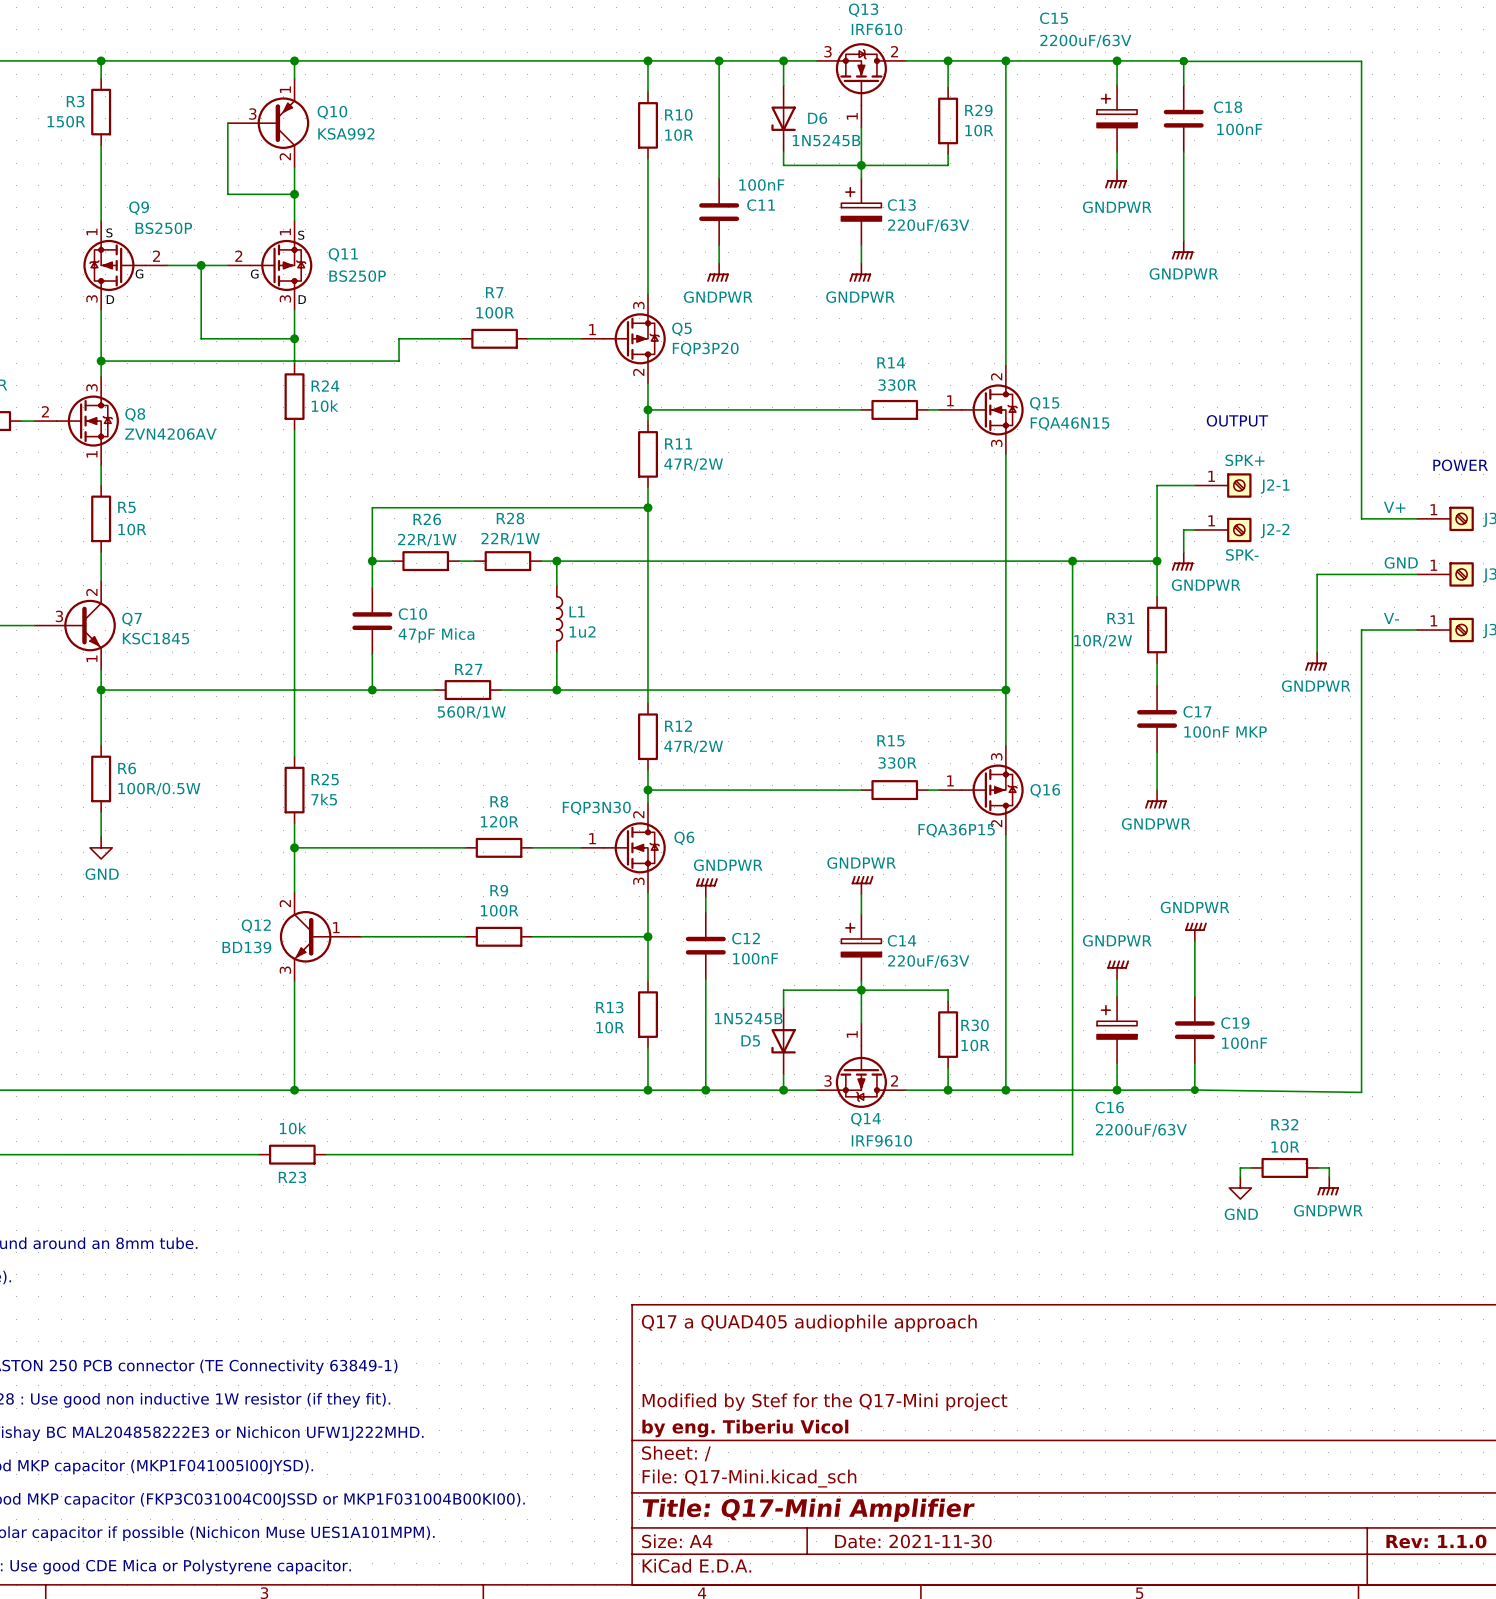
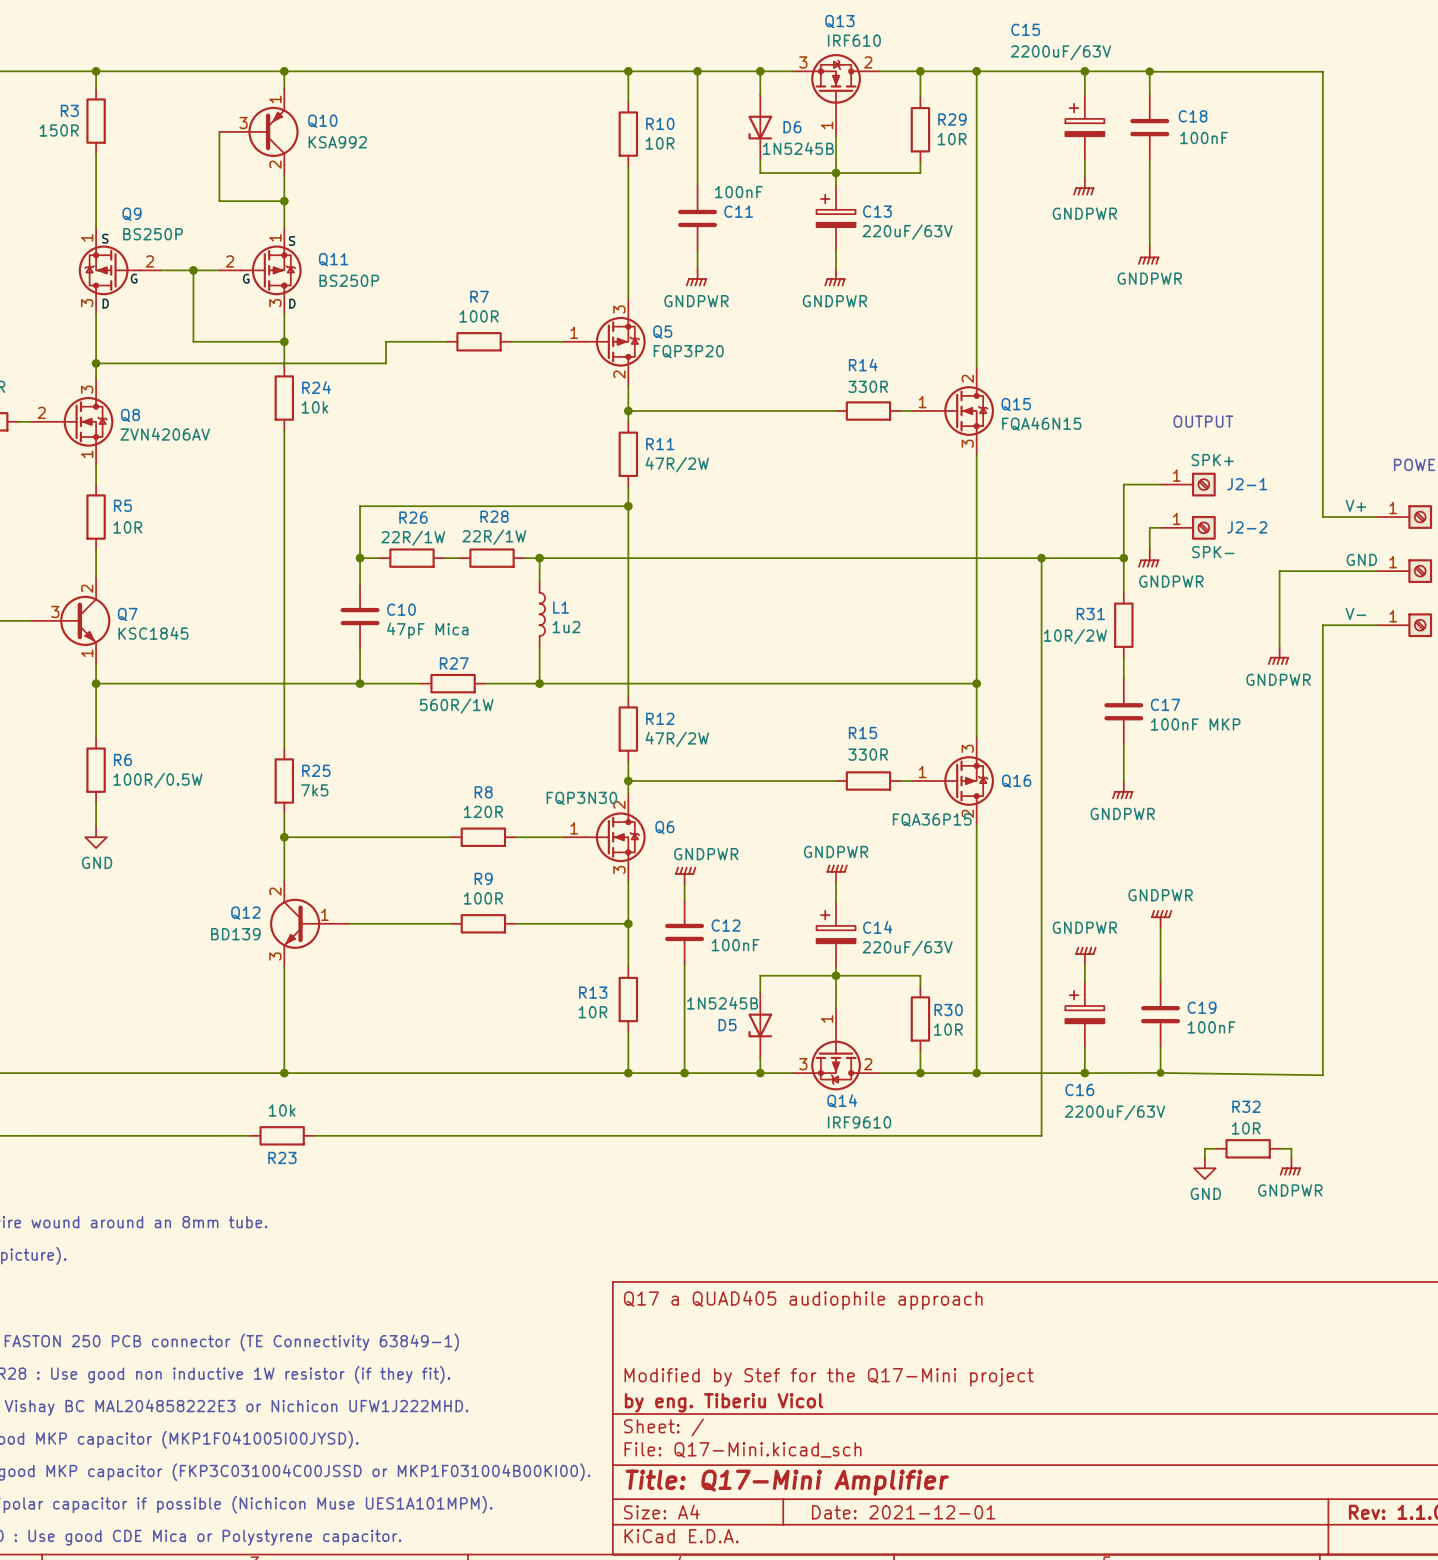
title block: Date: 2021-11-30 (913, 1541) -> Date: 2021-12-01 (903, 1512)

